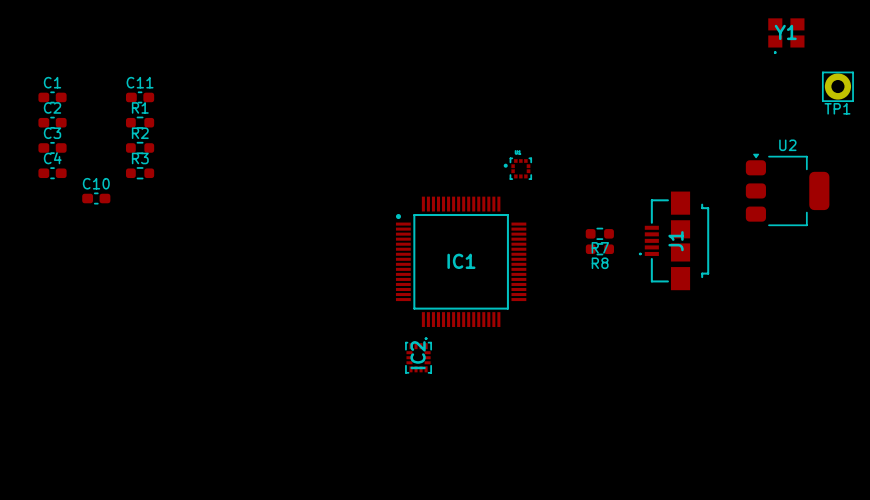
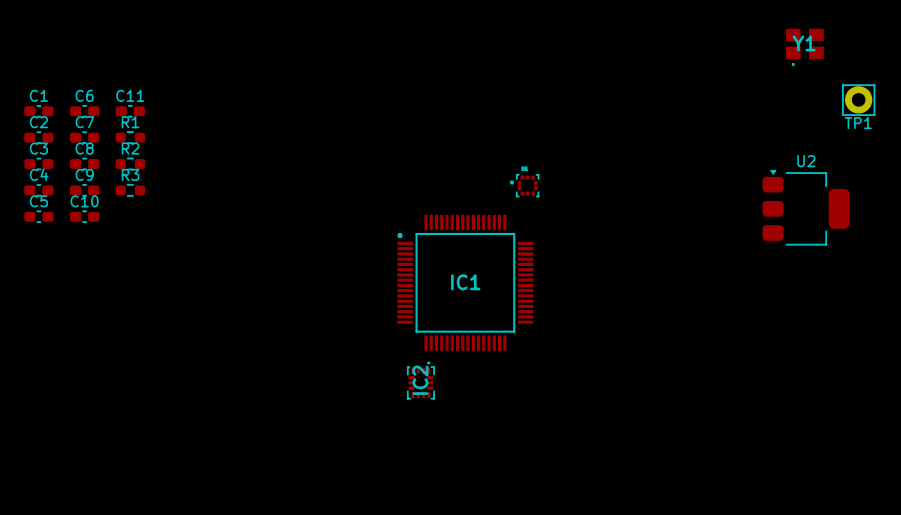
C6: none -> (84, 111)
C7: none -> (84, 137)
C8: none -> (84, 163)
C9: none -> (84, 190)
C5: none -> (38, 216)
R7: (599, 233) -> none
J1: (674, 240) -> none
R8: (599, 249) -> none

